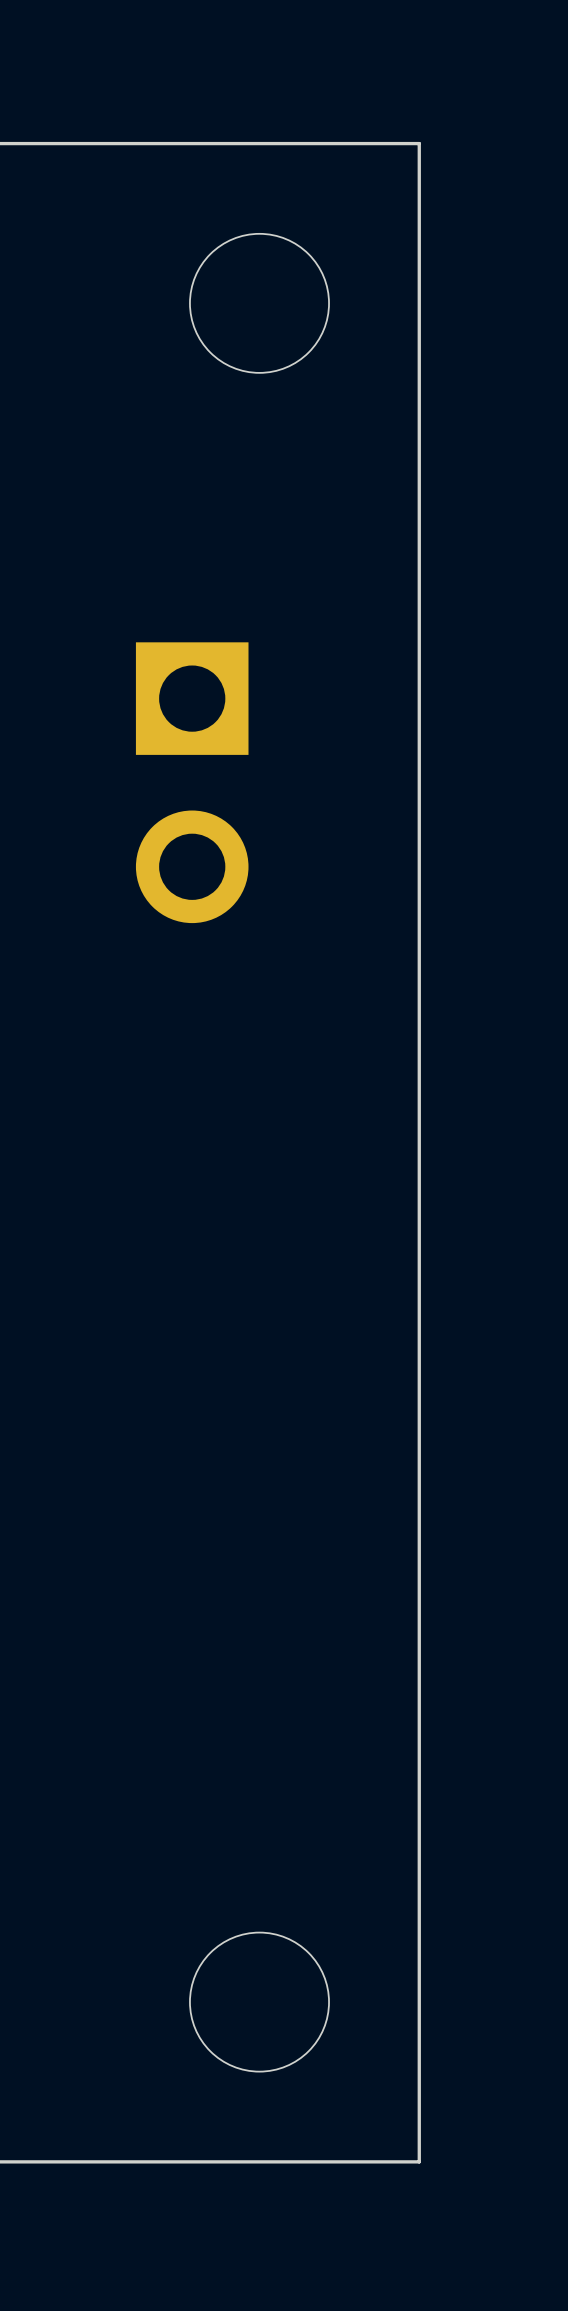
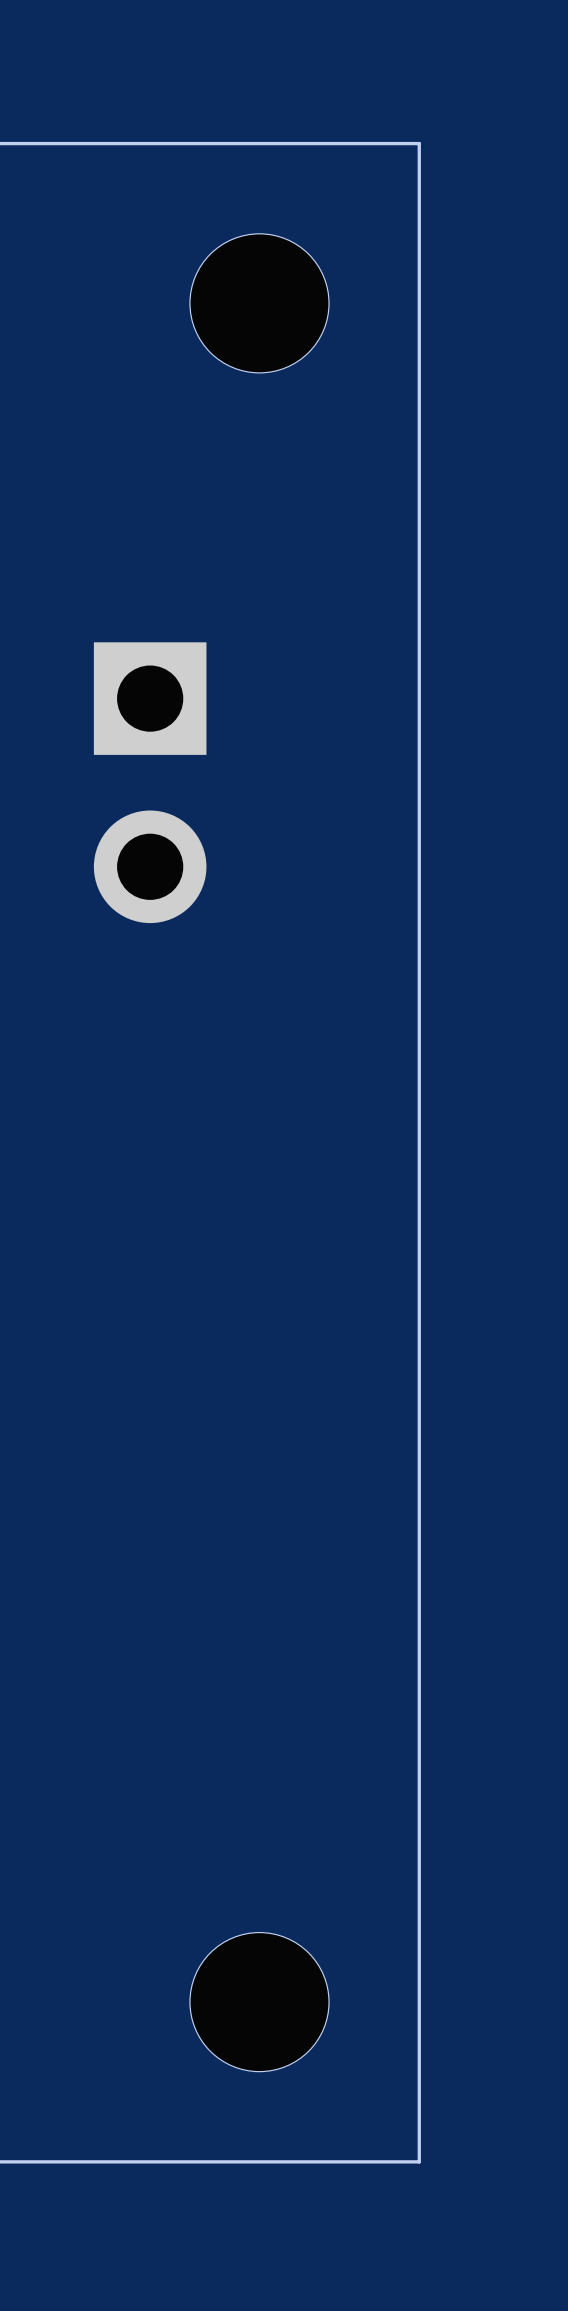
part position: (192, 782) -> (150, 782)

